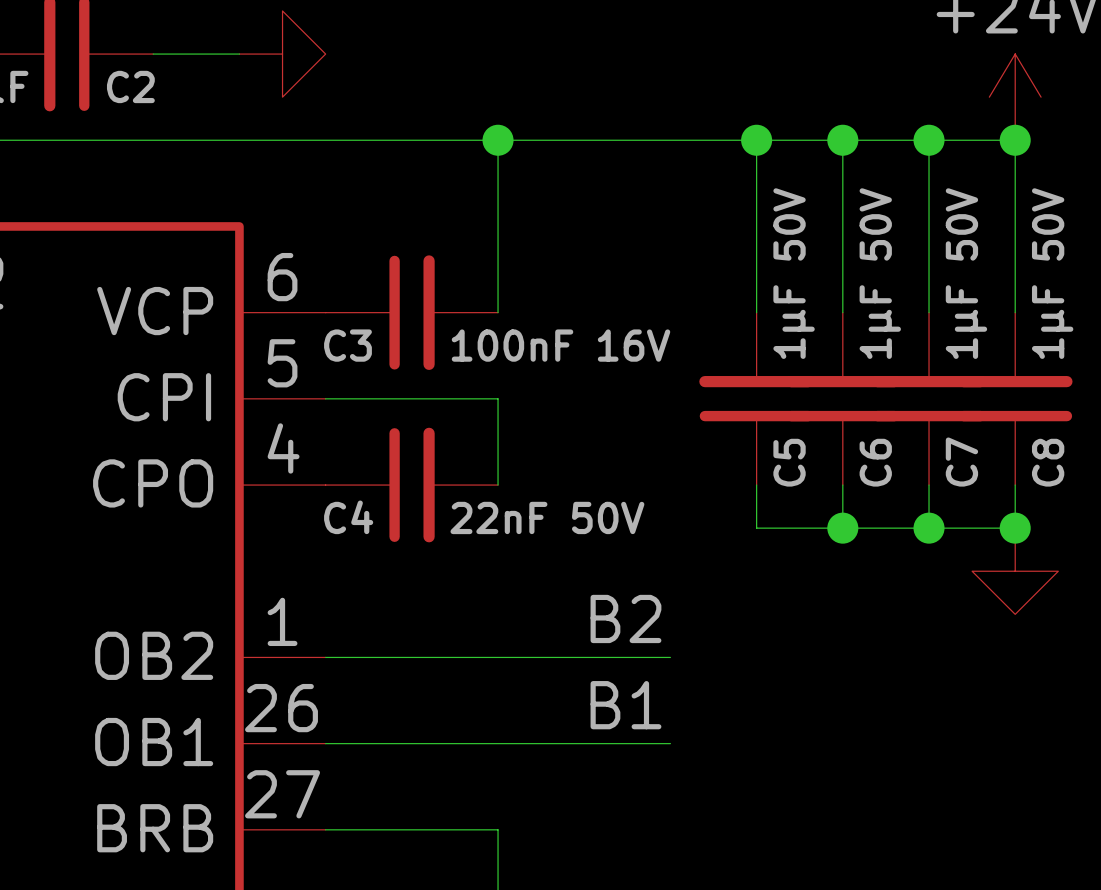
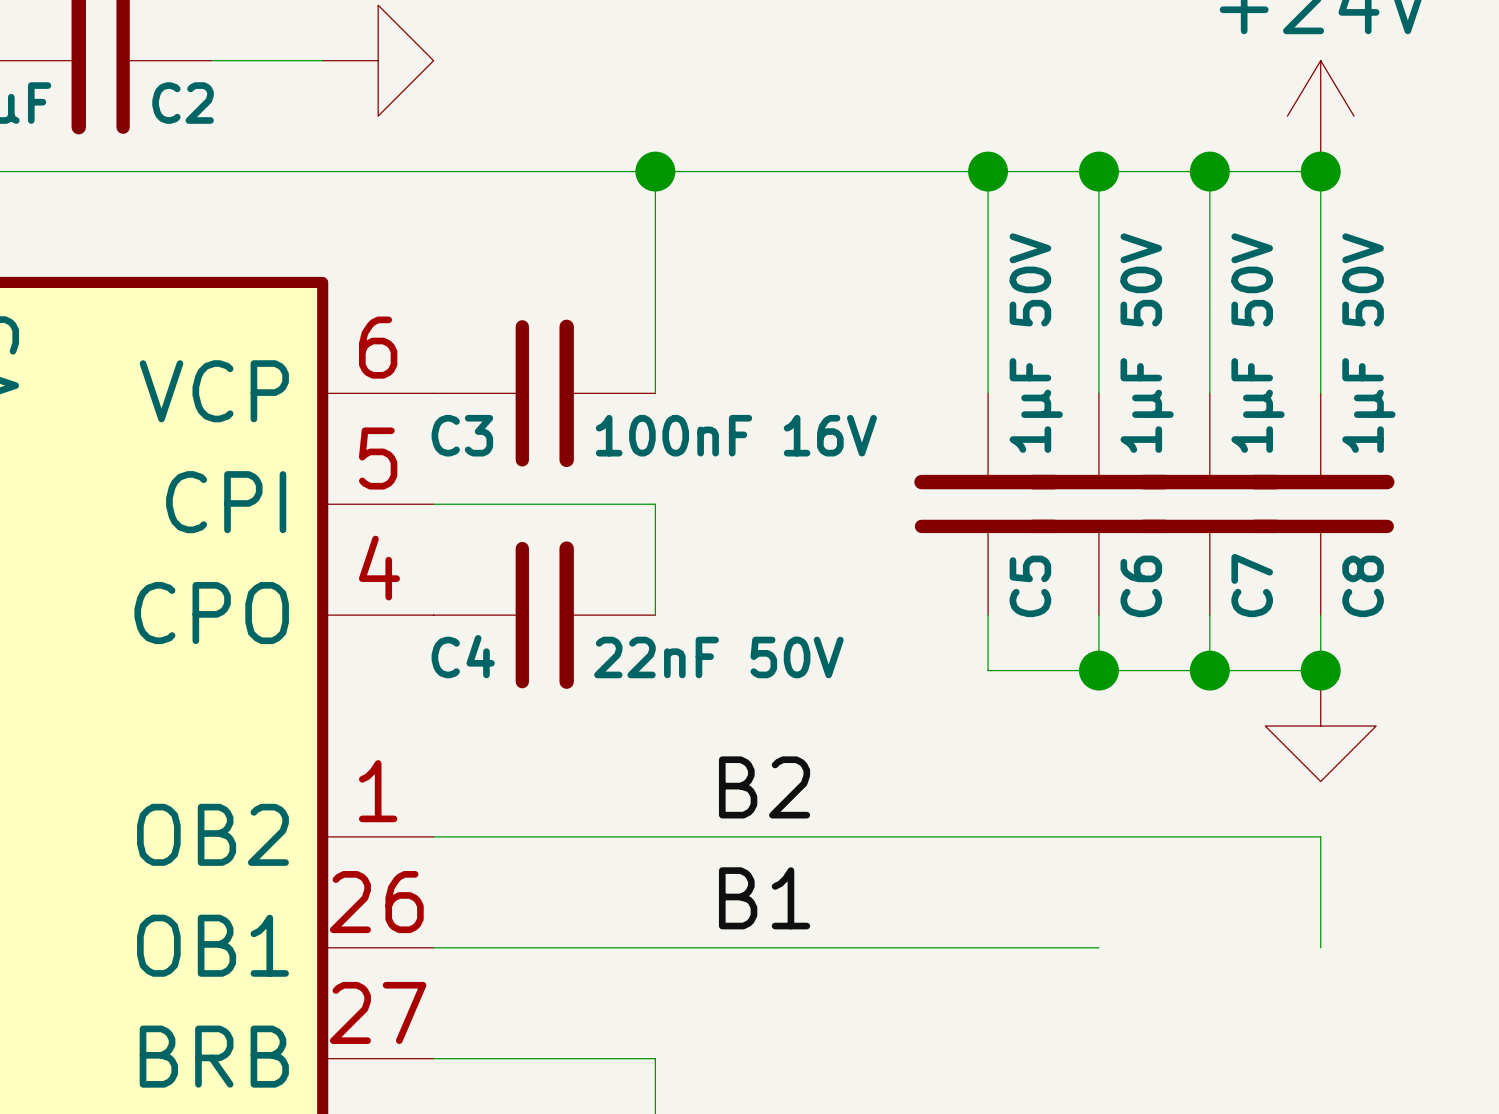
label position: B2 (625, 618) -> B2 (764, 787)
wire: none -> (877, 836) (1320, 836) (1320, 947)
label position: B1 (625, 705) -> B1 (764, 898)
wire: none -> (877, 947) (1098, 947)

